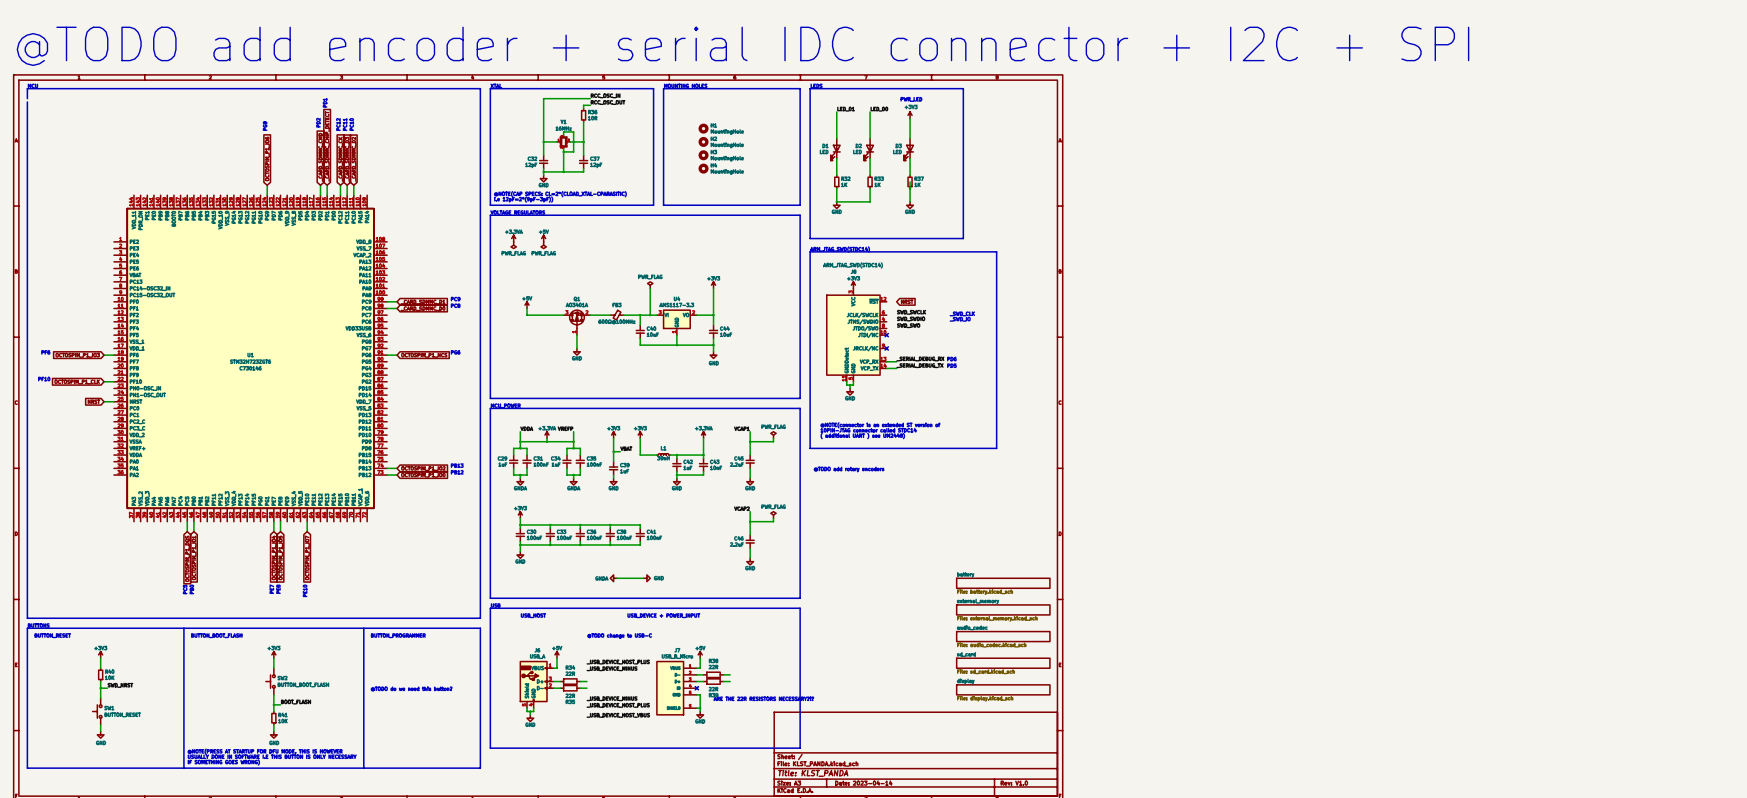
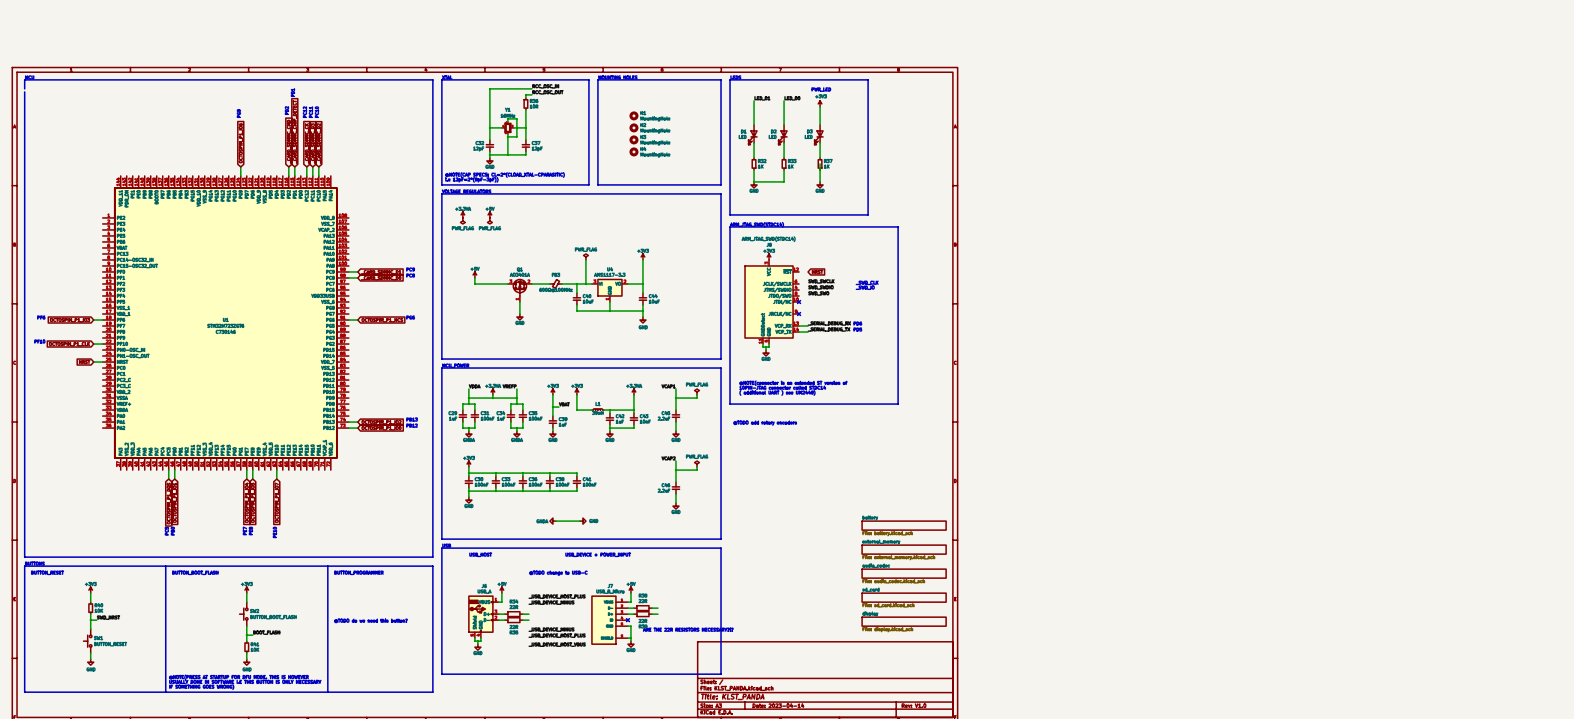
text: @TODO add encoder + serial IDC connector + I2C + SPI (742, 46) -> none

